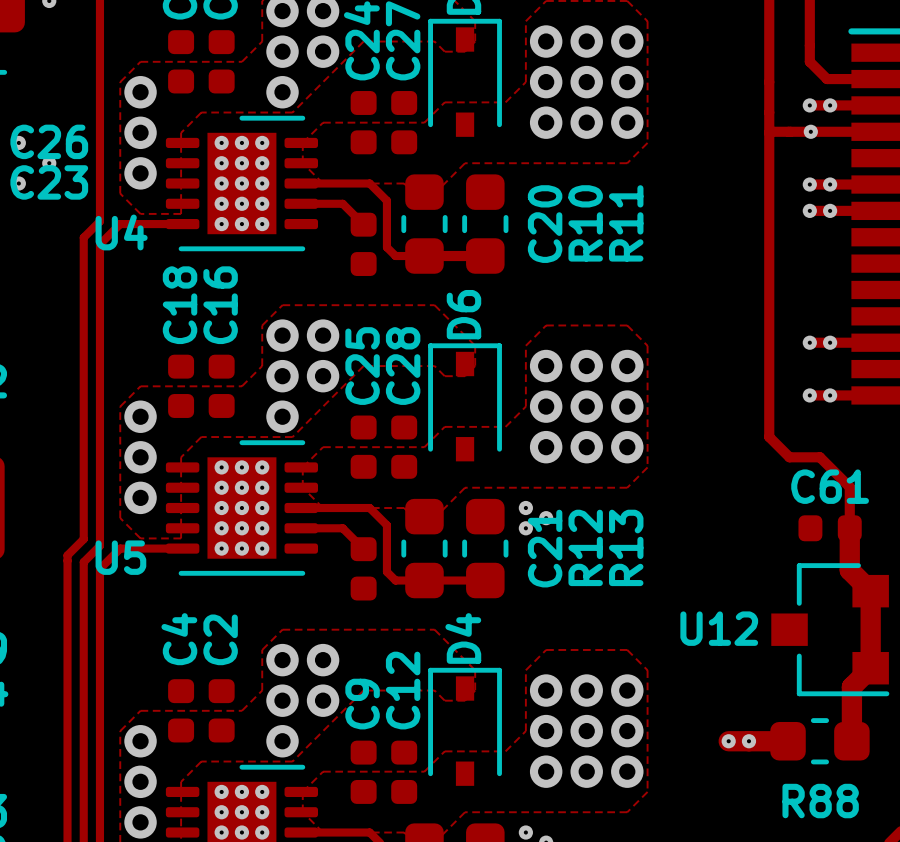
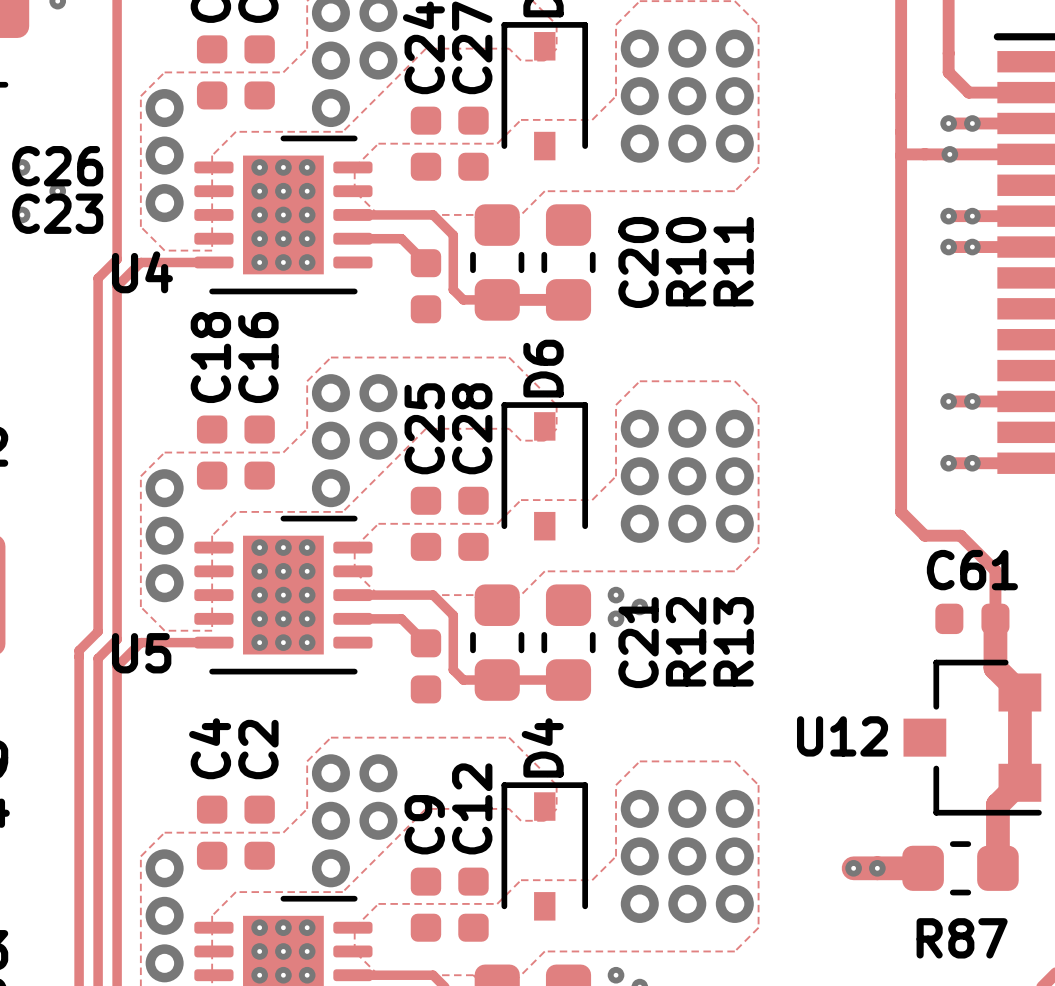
R88 name: R88 (820, 801) -> R87 (962, 938)

